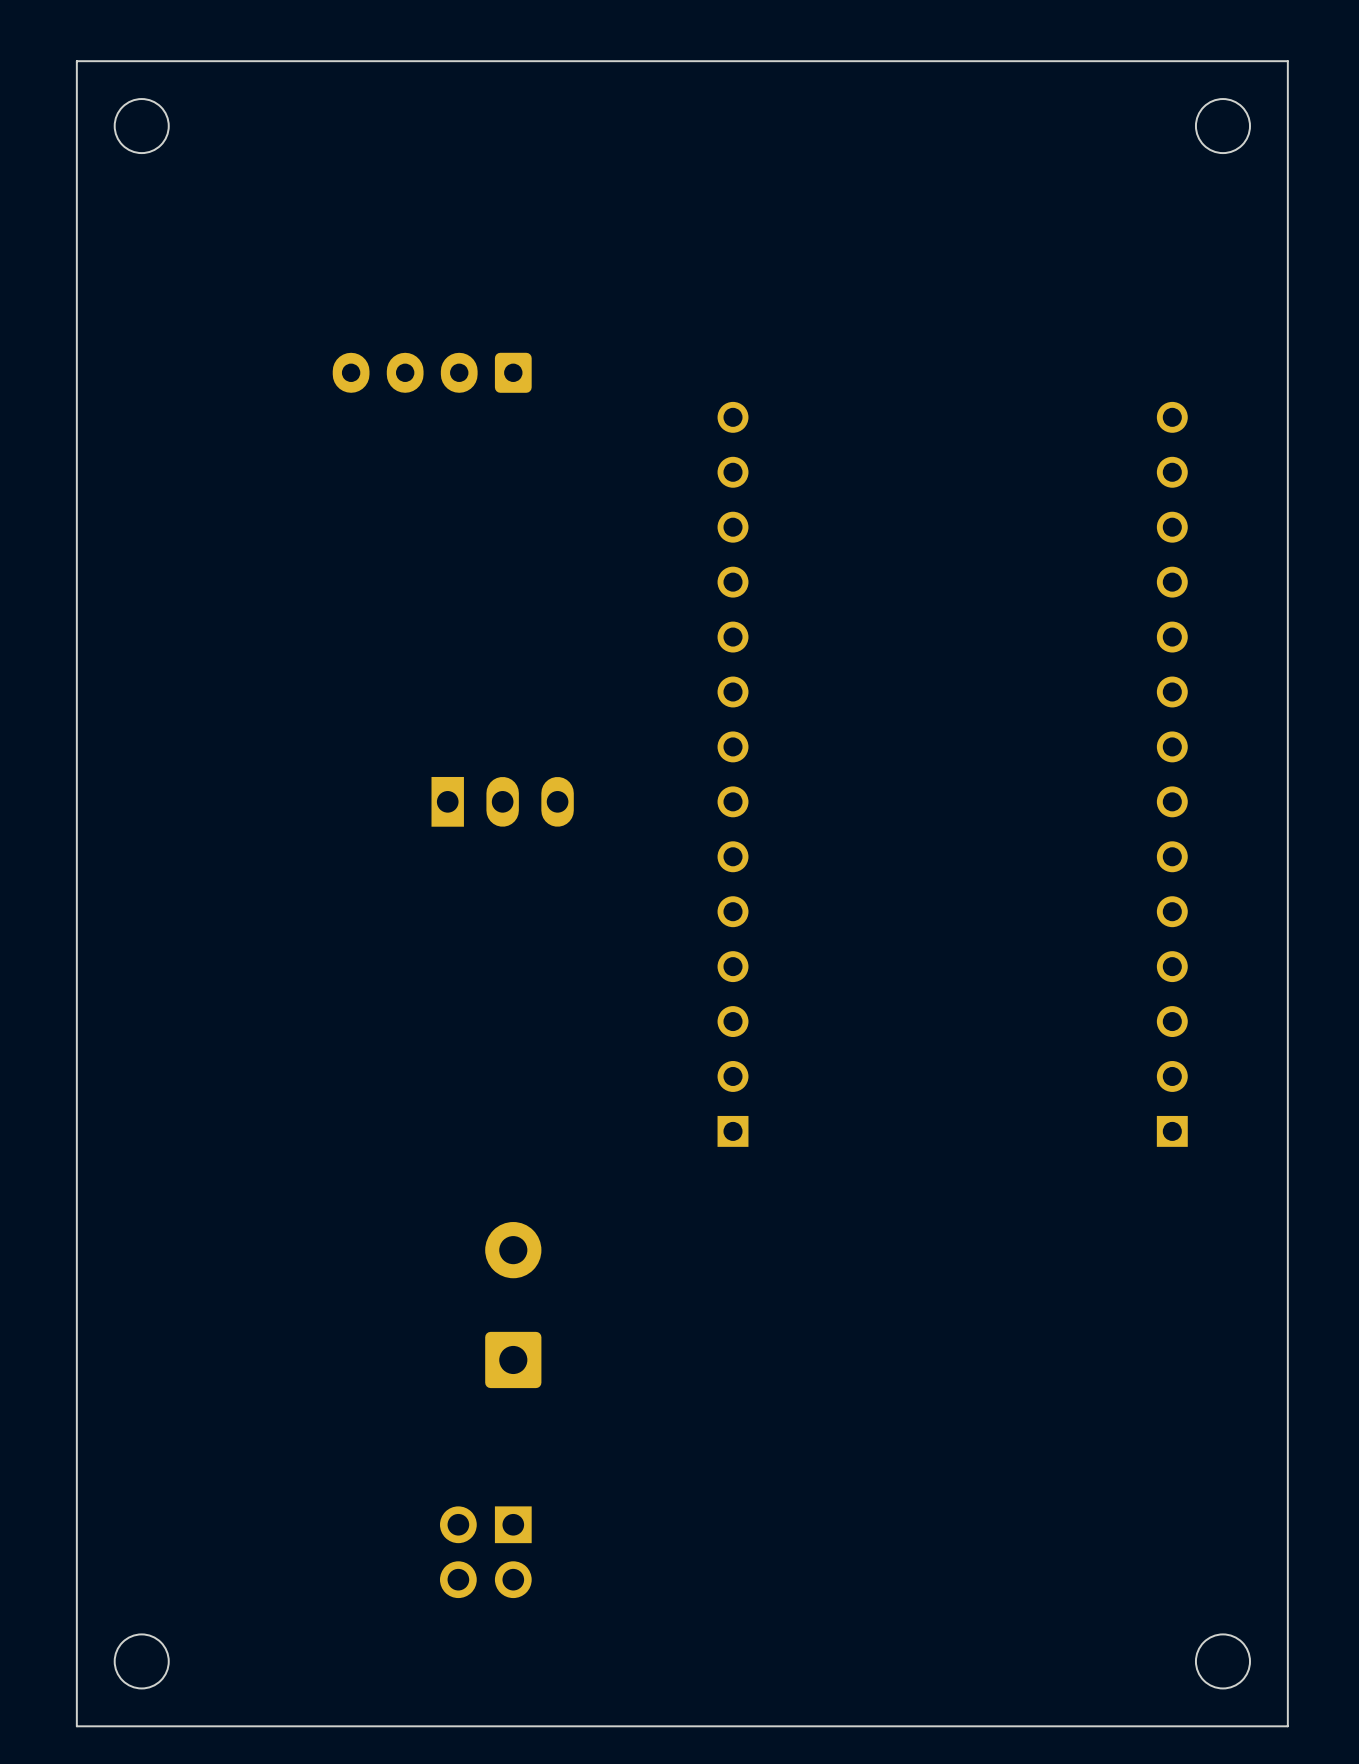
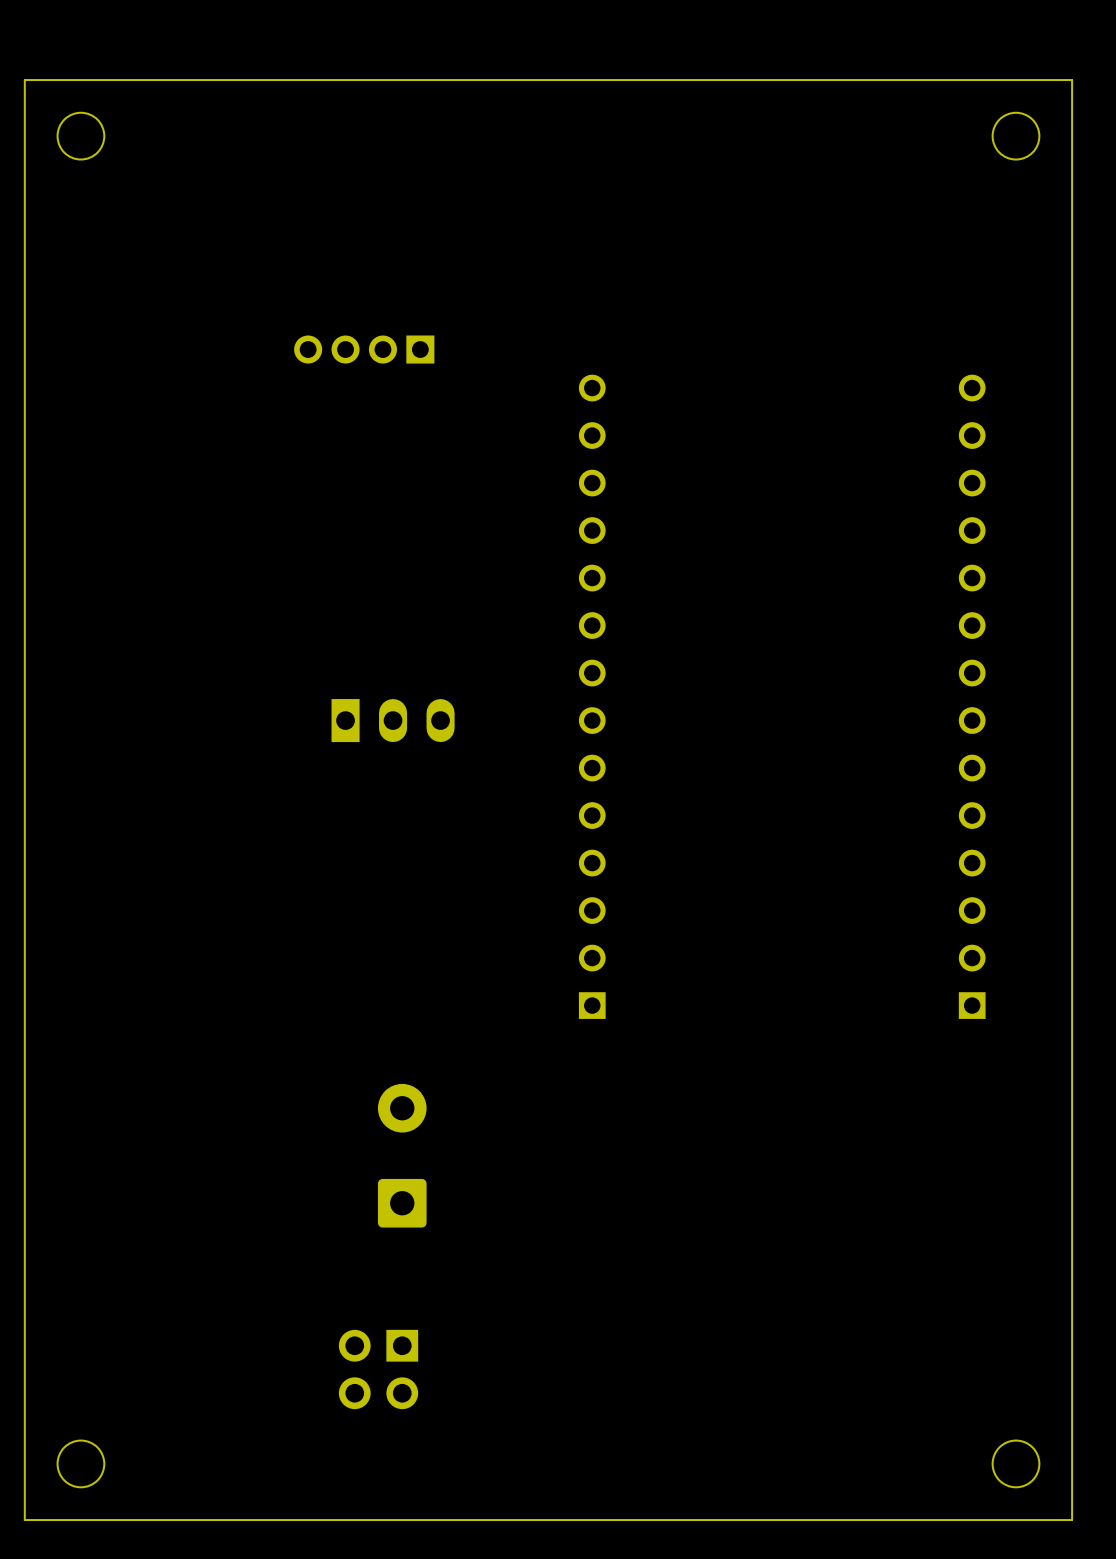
part: (432, 372) -> none
part: none -> (364, 349)

